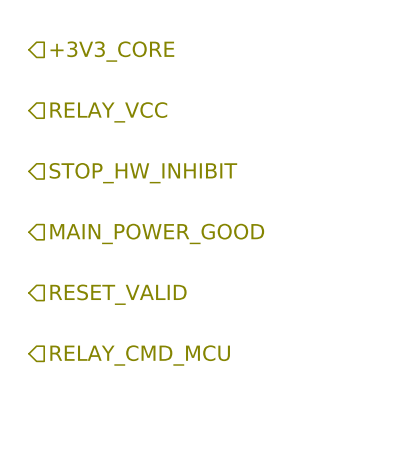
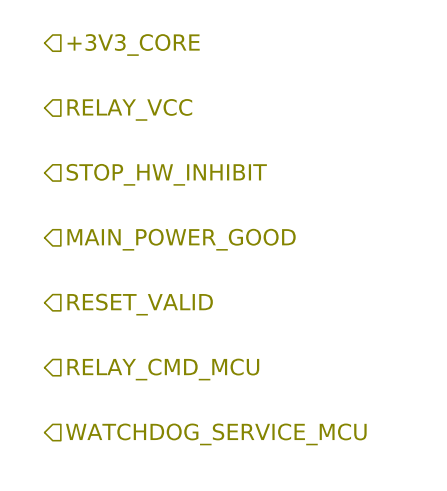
hierarchical label: none -> WATCHDOG_SERVICE_MCU (216, 434)

